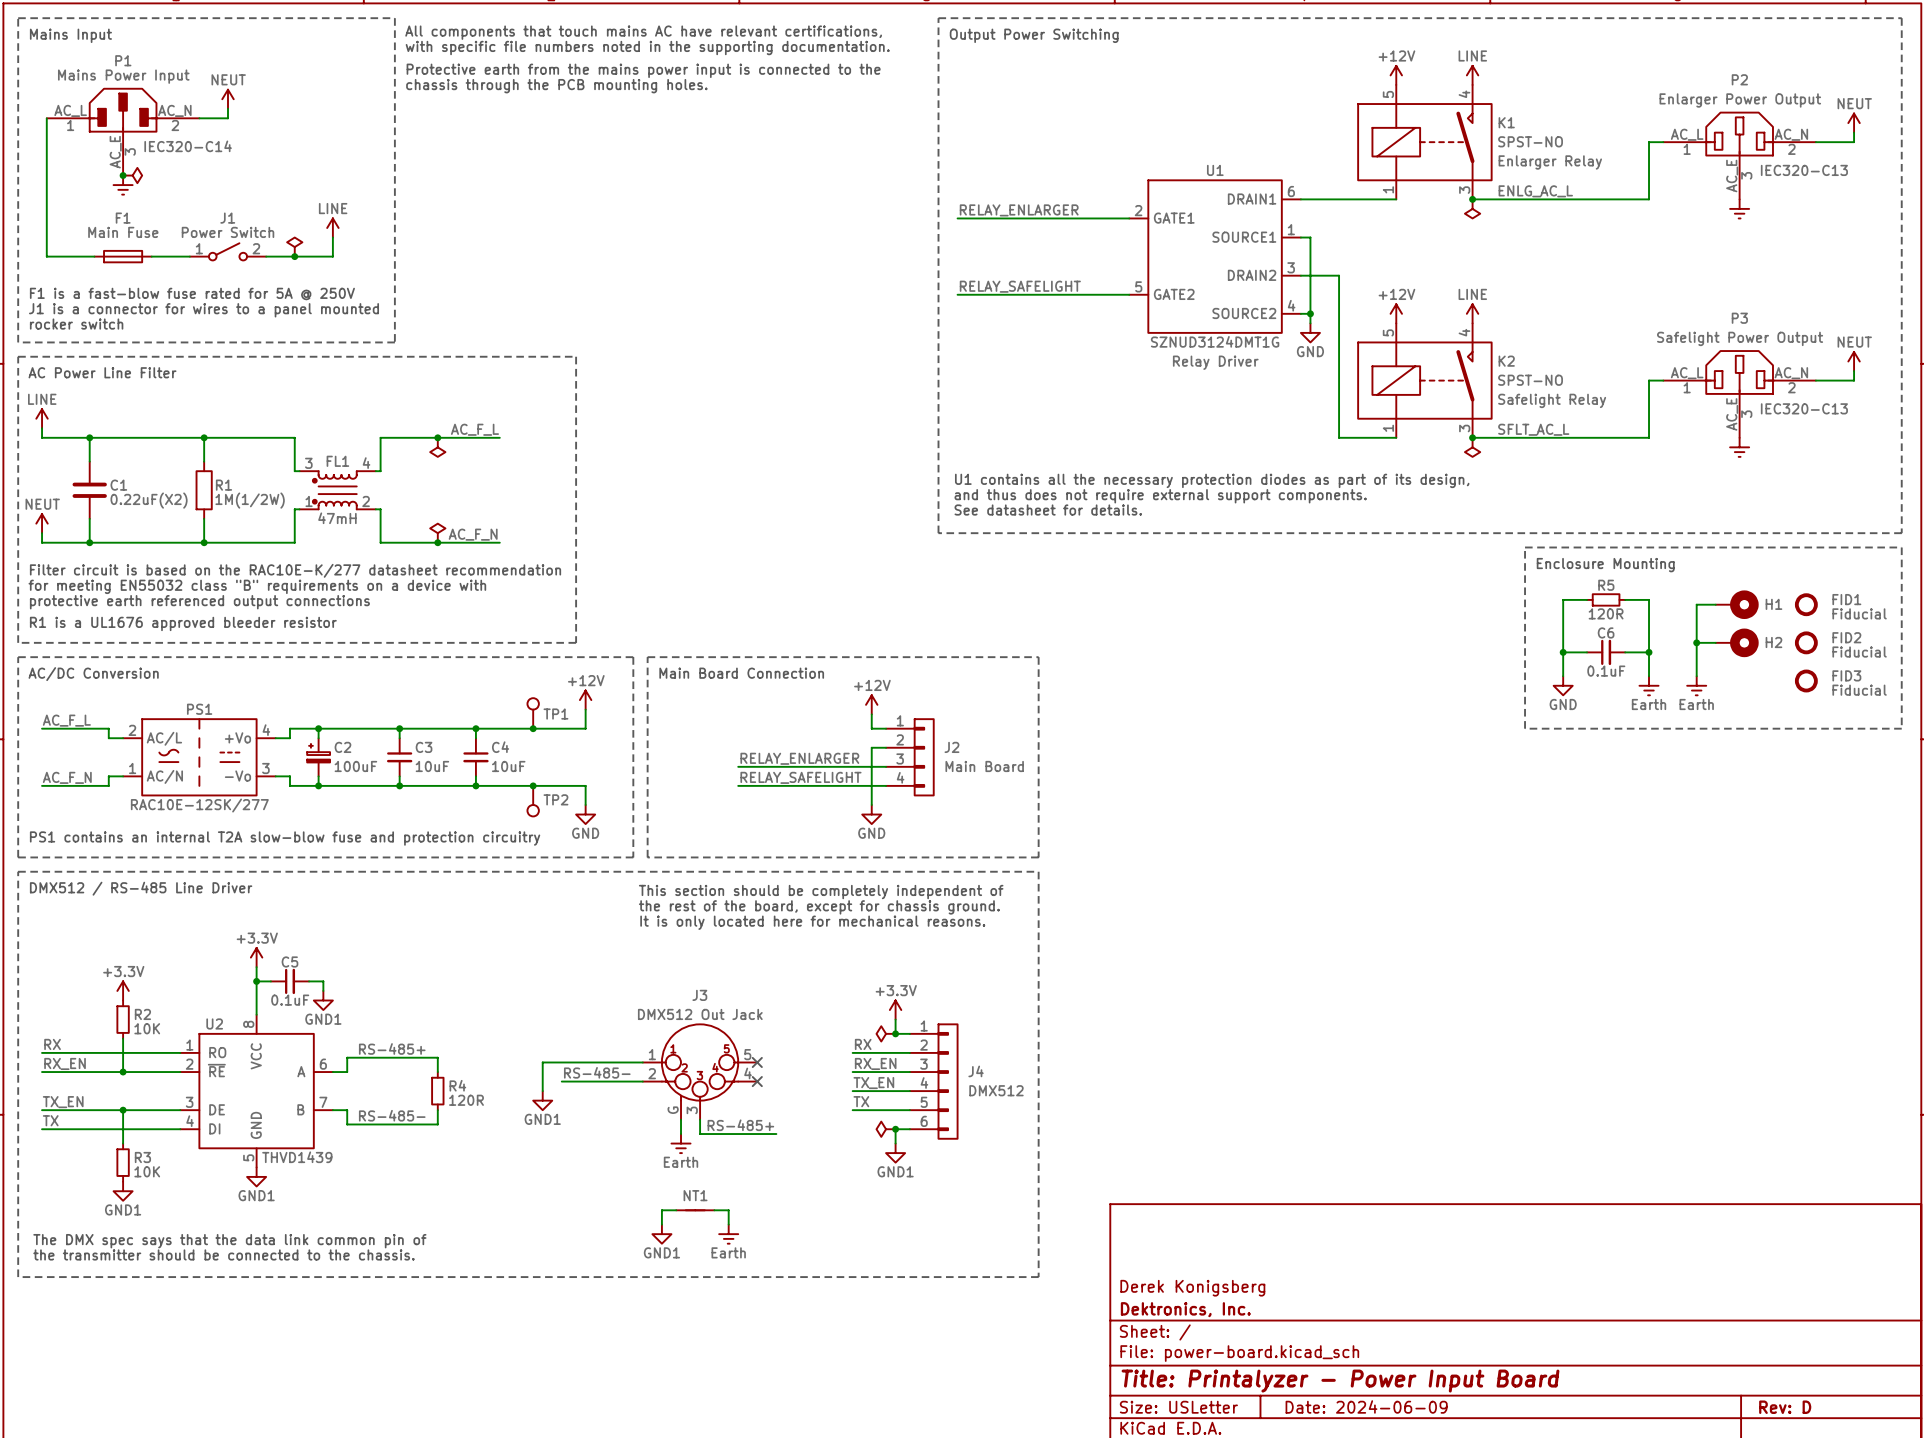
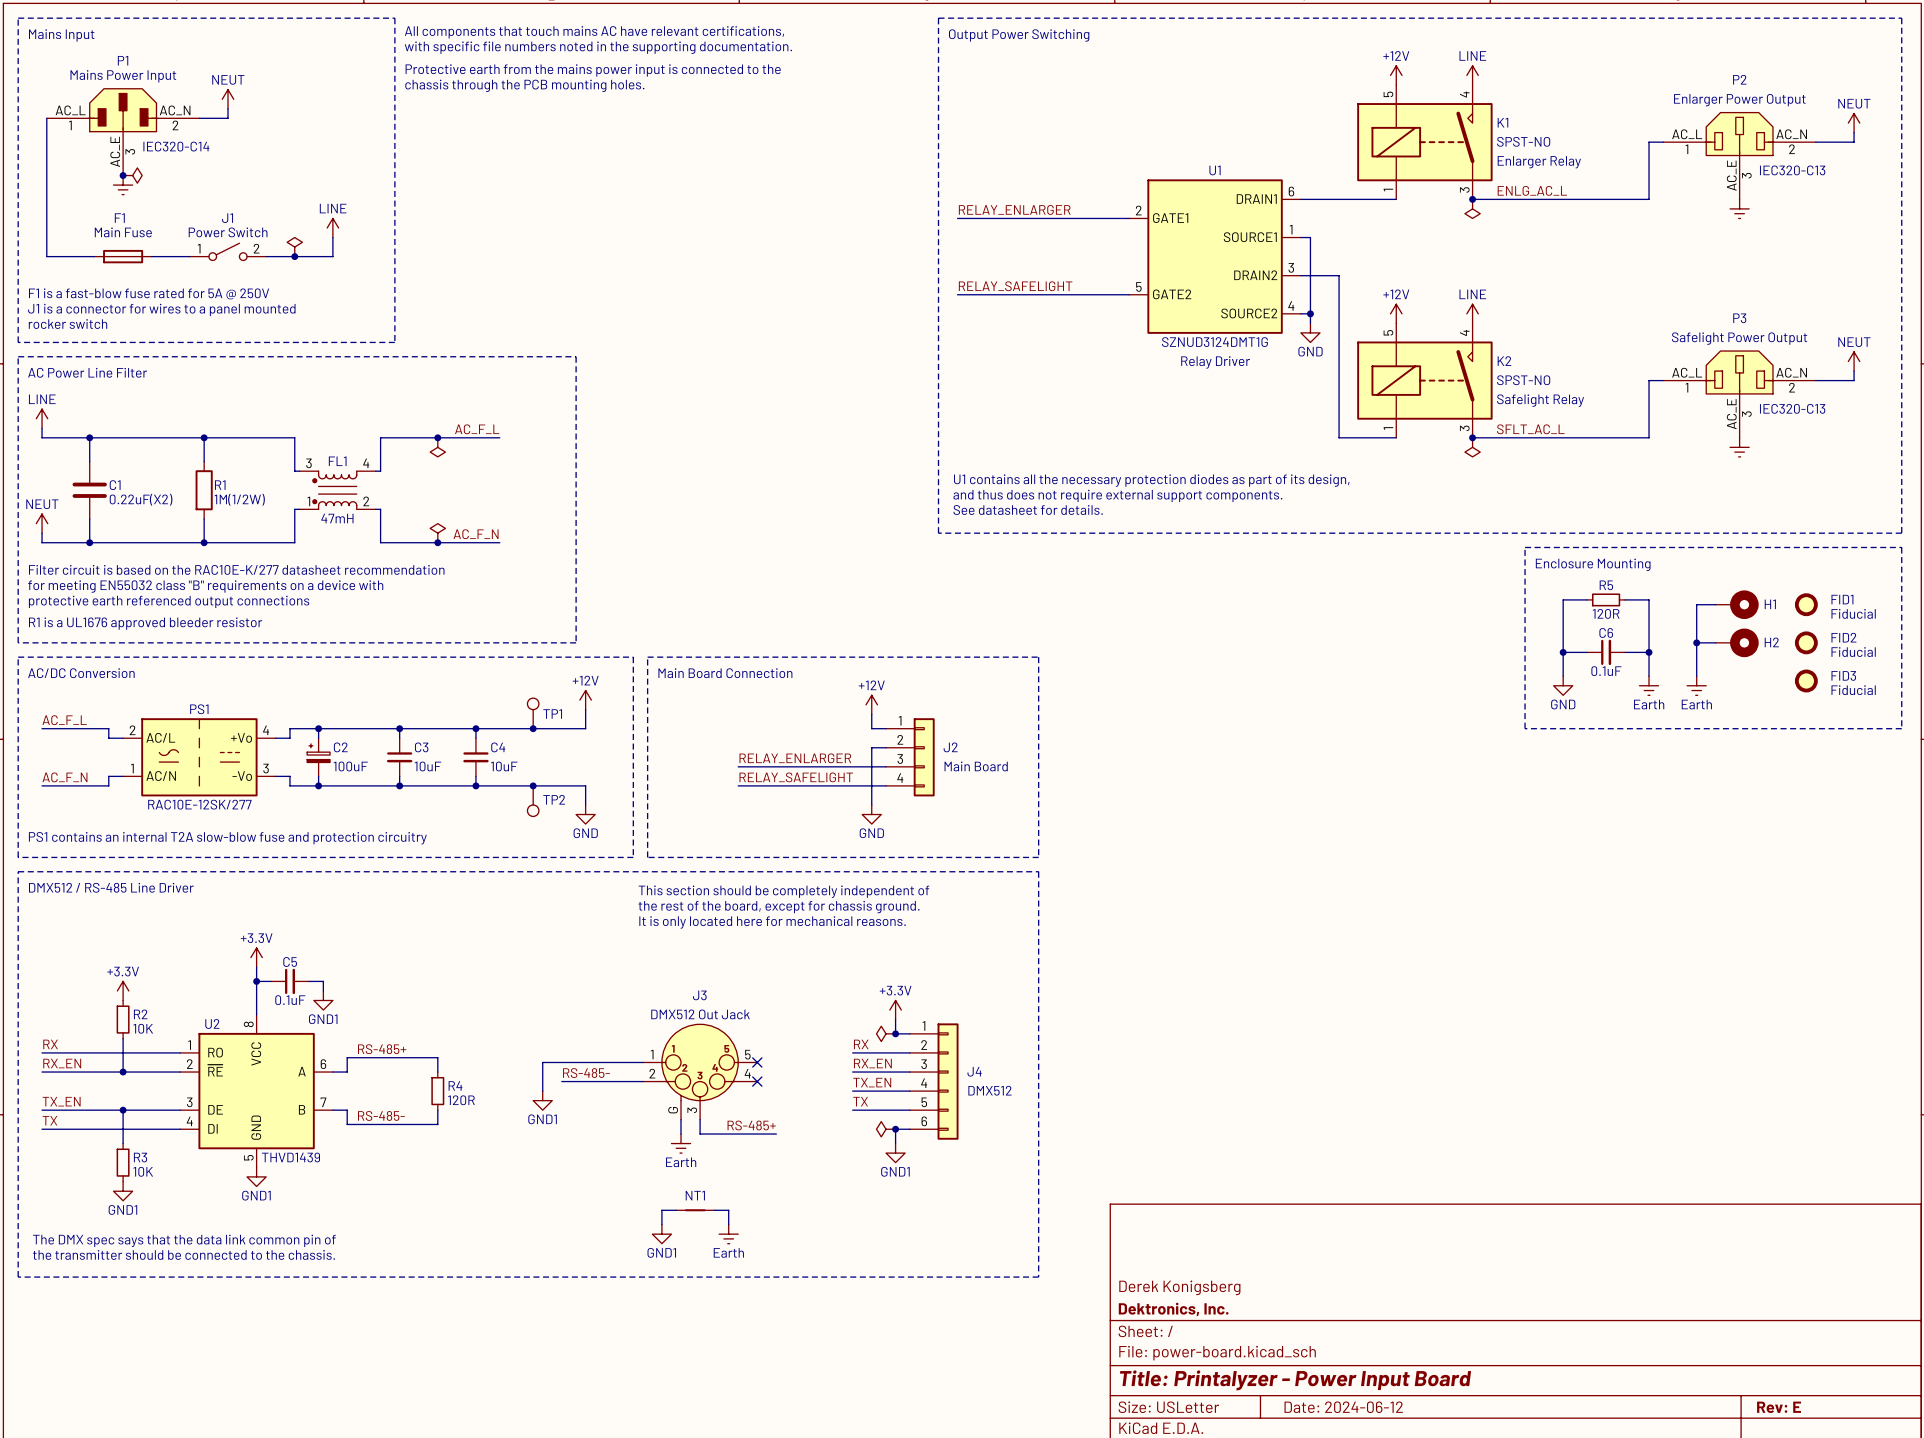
title block: Date: 2024-06-09 (1366, 1406) -> Date: 2024-06-12 (1343, 1407)
title block: Rev: D (1785, 1407) -> Rev: E (1779, 1407)

